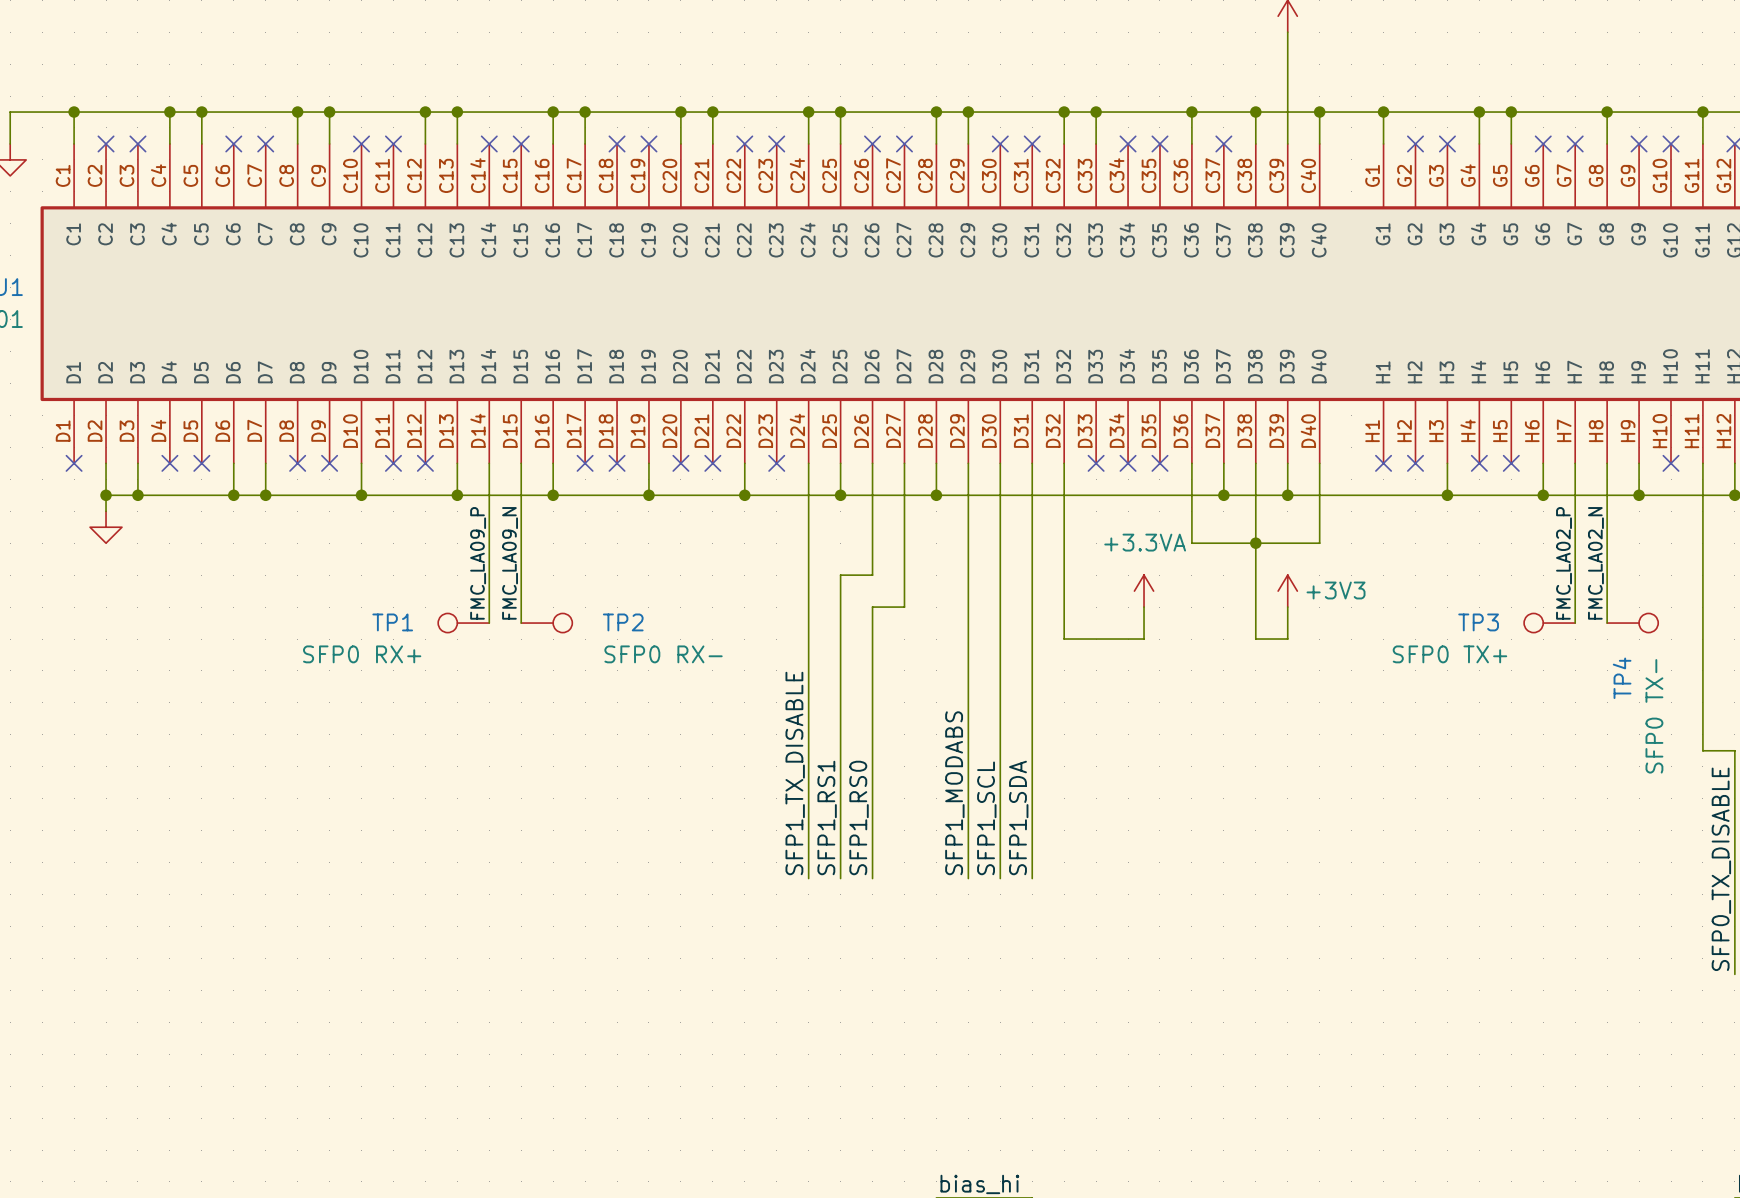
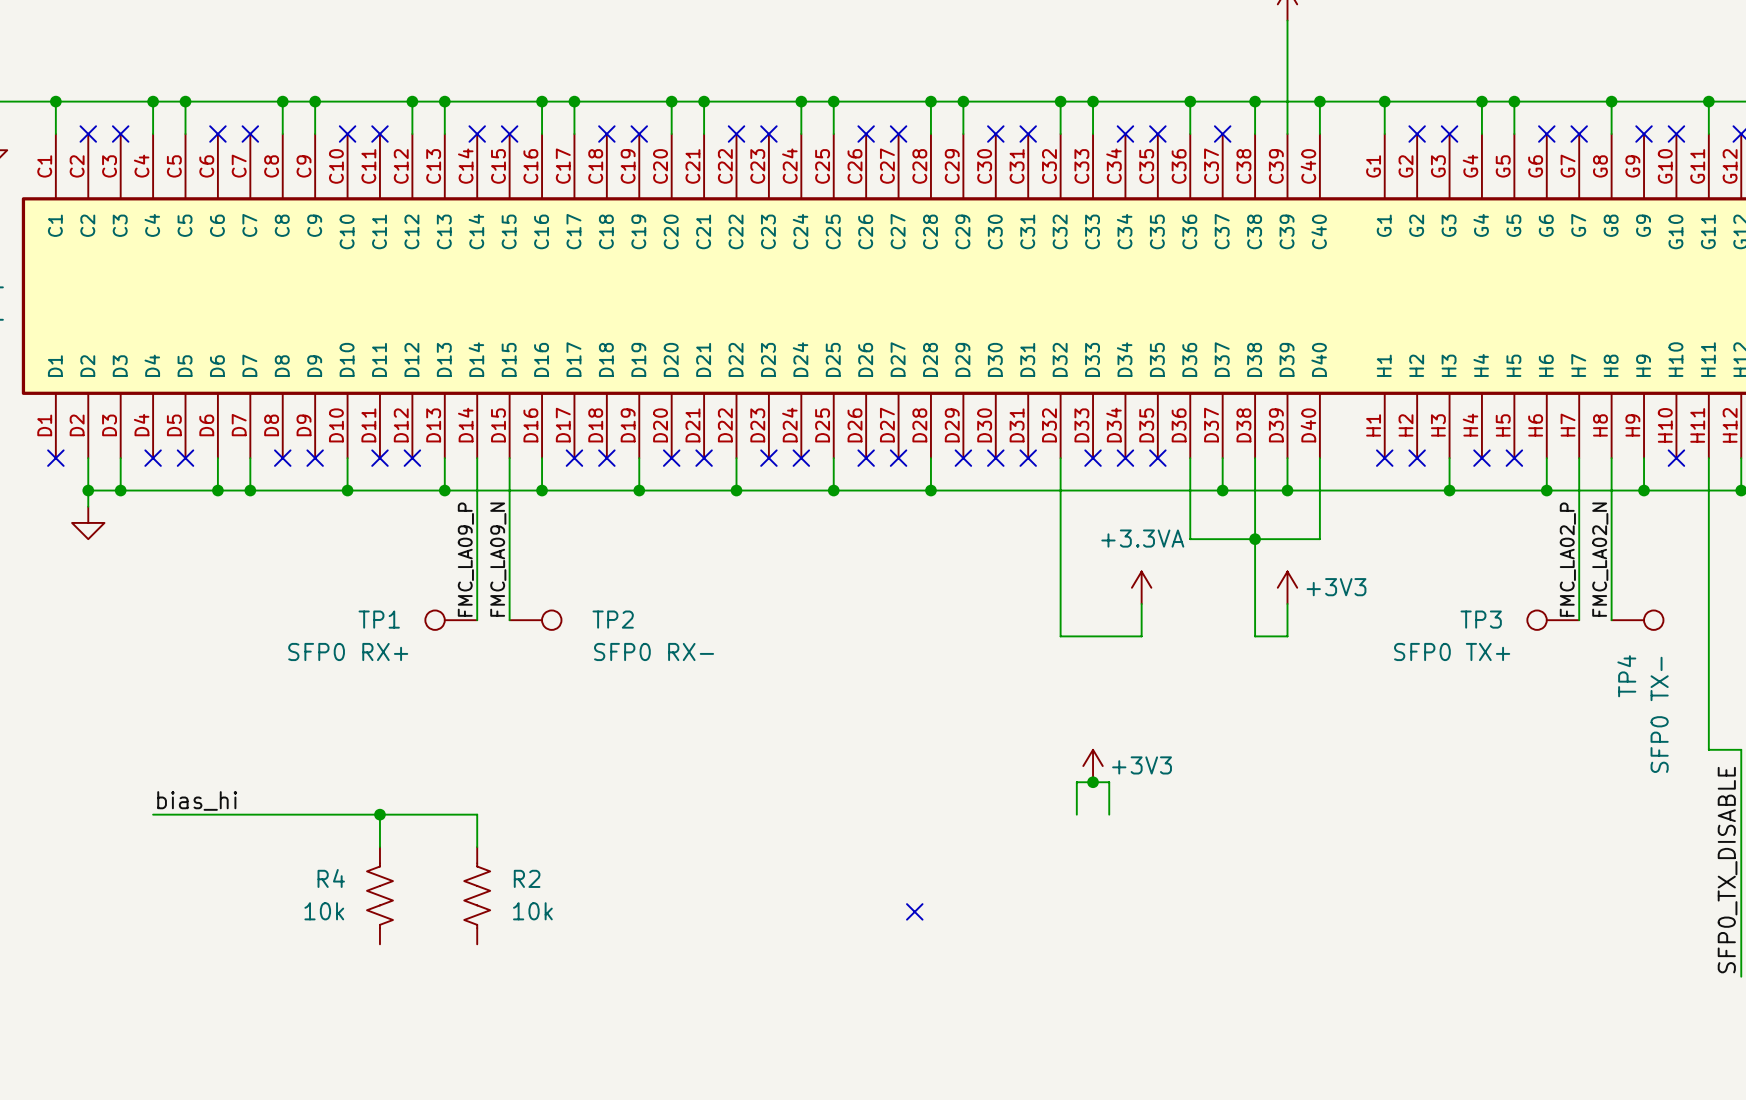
wire: (808, 463) (808, 878) -> none
no-connect mark: none -> (801, 458)
wire: (872, 463) (872, 575) (840, 575) (840, 878) -> none
no-connect mark: none -> (866, 458)
wire: (904, 463) (904, 607) (872, 607) (872, 878) -> none
no-connect mark: none -> (898, 458)
wire: (968, 463) (968, 878) -> none
no-connect mark: none -> (963, 458)
wire: (1000, 463) (1000, 878) -> none
no-connect mark: none -> (995, 458)
wire: (1032, 463) (1032, 878) -> none
no-connect mark: none -> (1028, 458)
power symbol: none -> +3V3 (1093, 766)
label: SFP1_TX_DISABLE (795, 773) -> none
junction: none -> (1093, 782)
label: SFP1_MODABS (954, 793) -> none
label: none -> bias_hi (197, 800)
wire: none -> (153, 814) (477, 814) (477, 847)
wire: none -> (379, 814) (379, 847)
junction: none -> (379, 814)
wire: none -> (1076, 814) (1076, 782) (1109, 782) (1109, 814)
label: SFP1_RS1 (827, 817) -> none
label: SFP1_RS0 (859, 817) -> none
label: SFP1_SDA (1018, 817) -> none
label: SFP1_SCL (986, 818) -> none
R4: none -> 10k (379, 895)
R2: none -> 10k (477, 895)
no-connect mark: none -> (914, 911)

